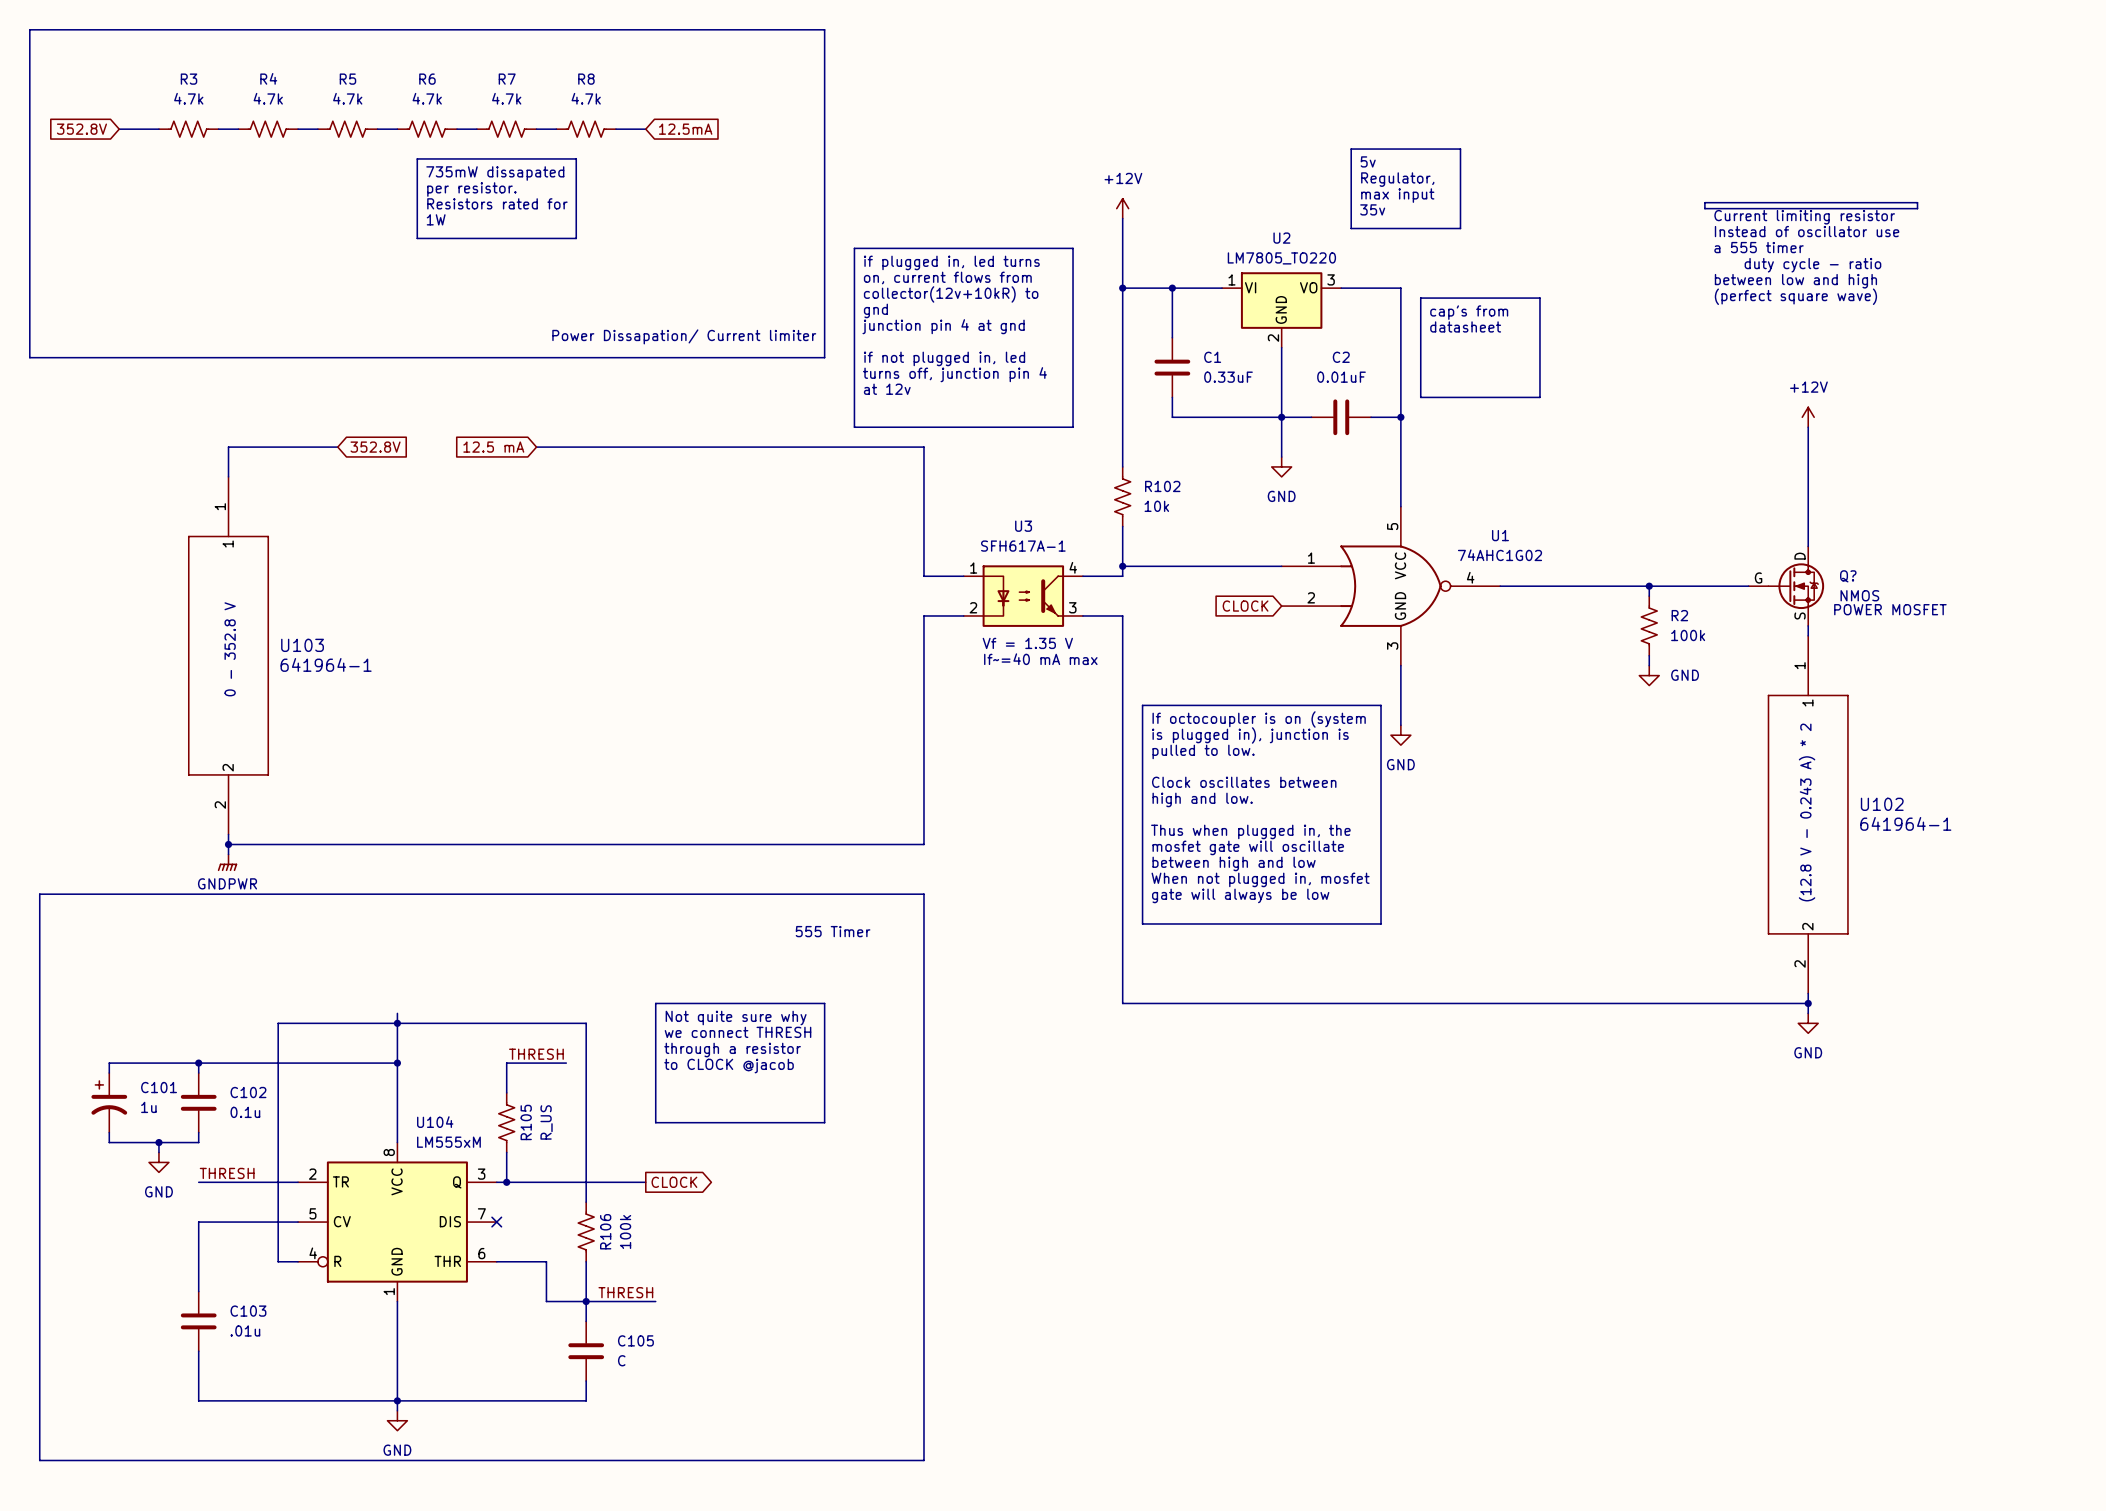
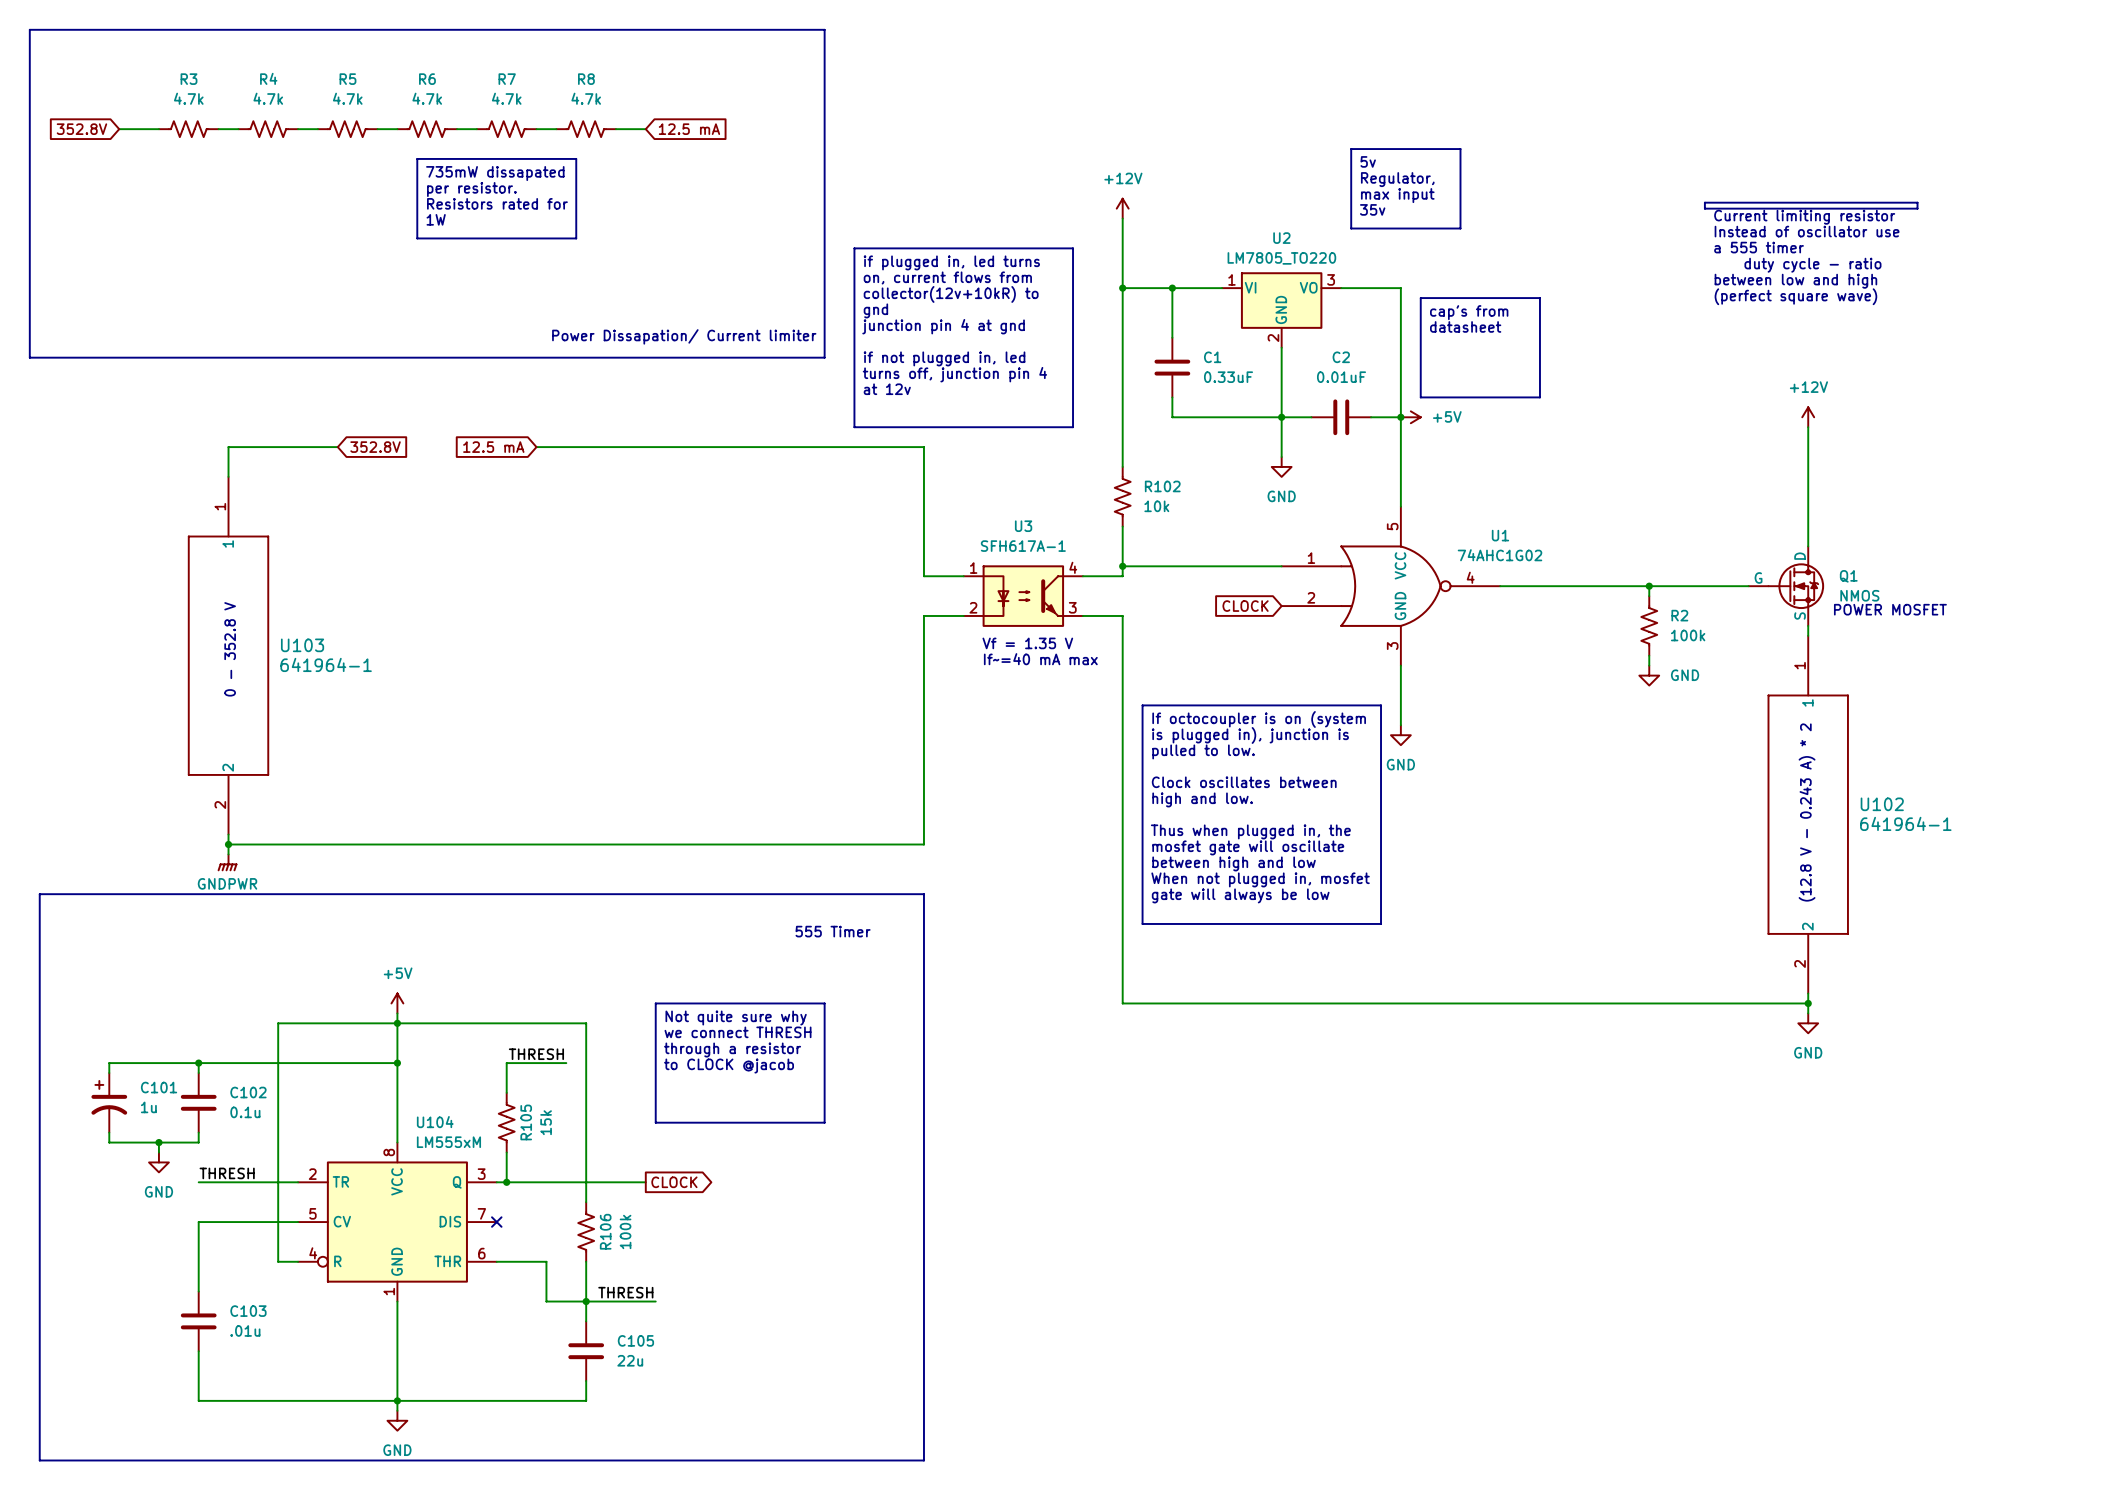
global label: 12.5mA (685, 129) -> 12.5 mA (689, 129)
power symbol: none -> +5V (1410, 417)
Q? name: Q? (1848, 576) -> Q1 (1848, 576)
power symbol: none -> +5V (397, 1003)
R105 value: R_US (546, 1122) -> 15k (546, 1122)
C105 value: C (621, 1360) -> 22u (630, 1360)

